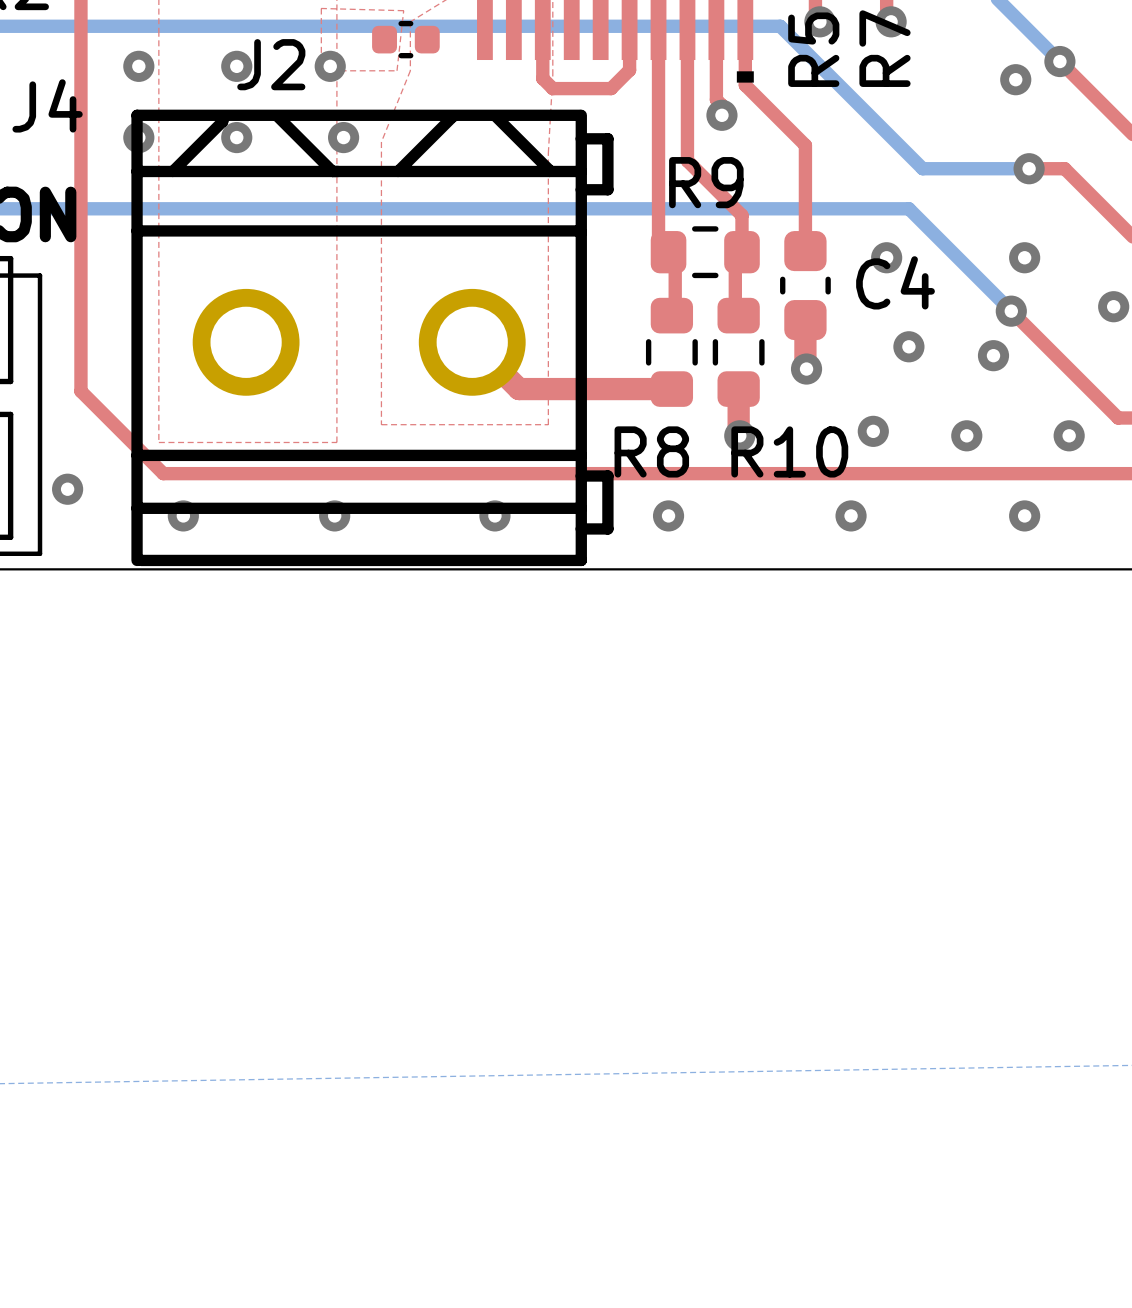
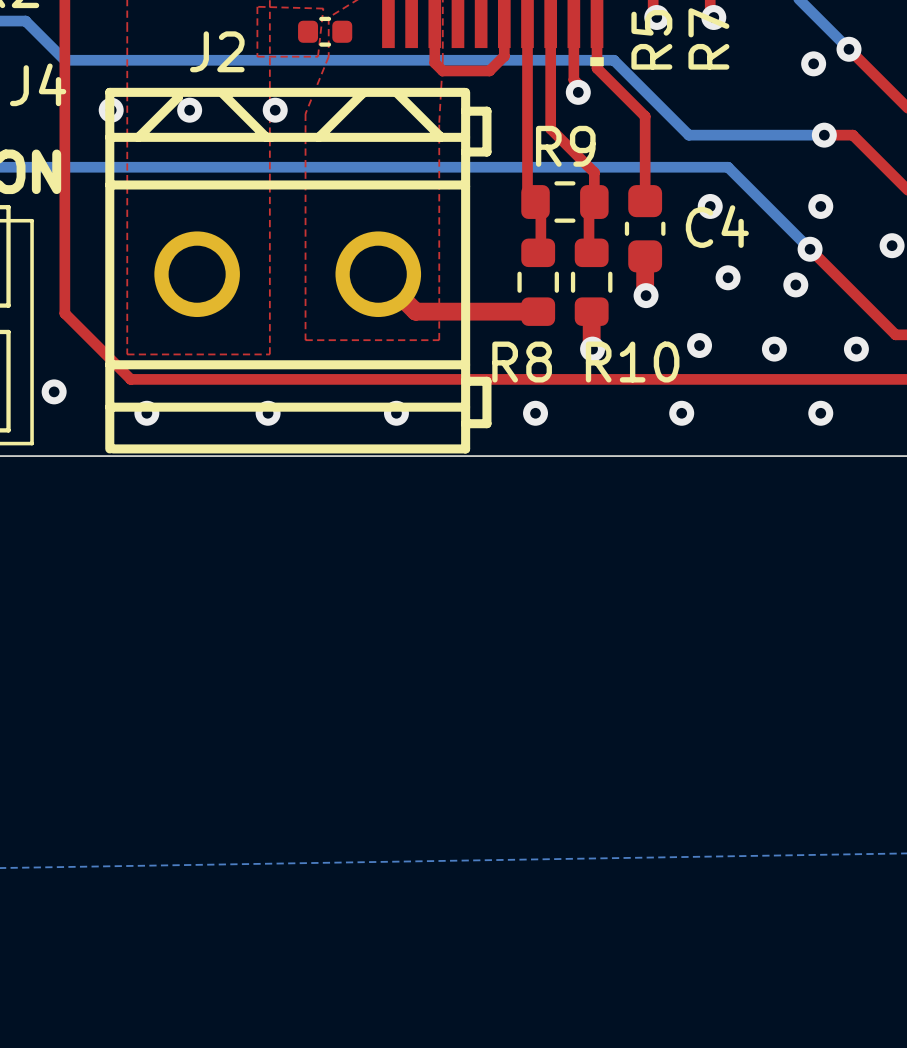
bottom track: (32, 26) (780, 26) (922, 168) -> (25, 21) (64, 60) (613, 60) (688, 135) (739, 135)
via: (138, 66) -> none
via: (236, 66) -> none
via: (330, 66) -> none

